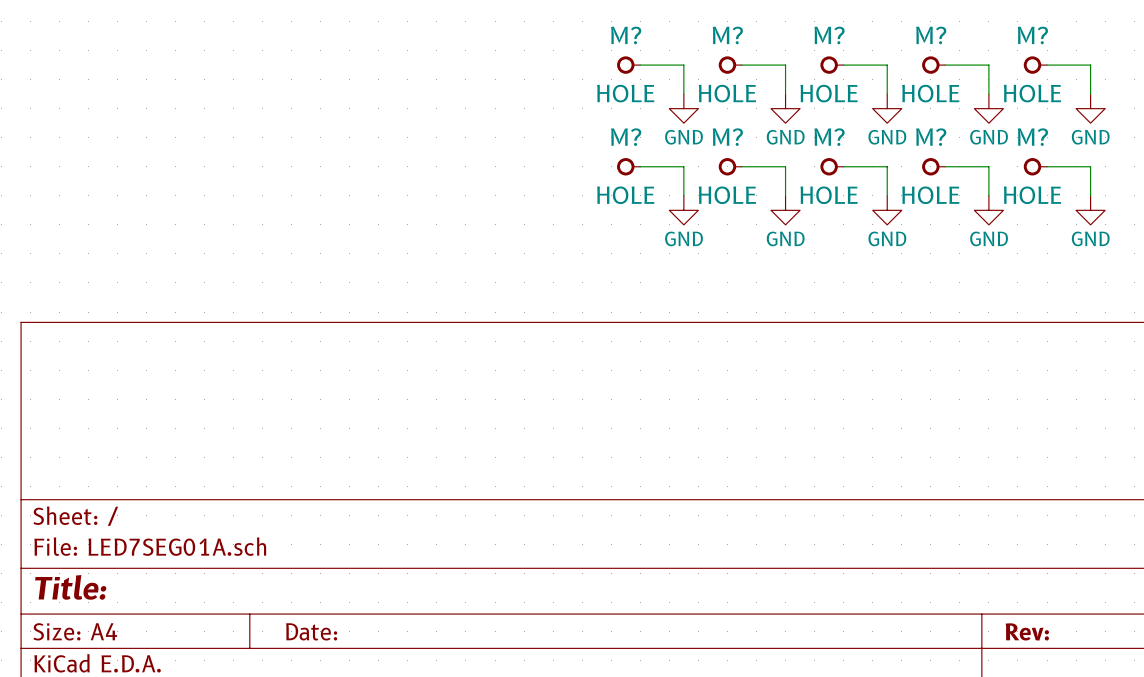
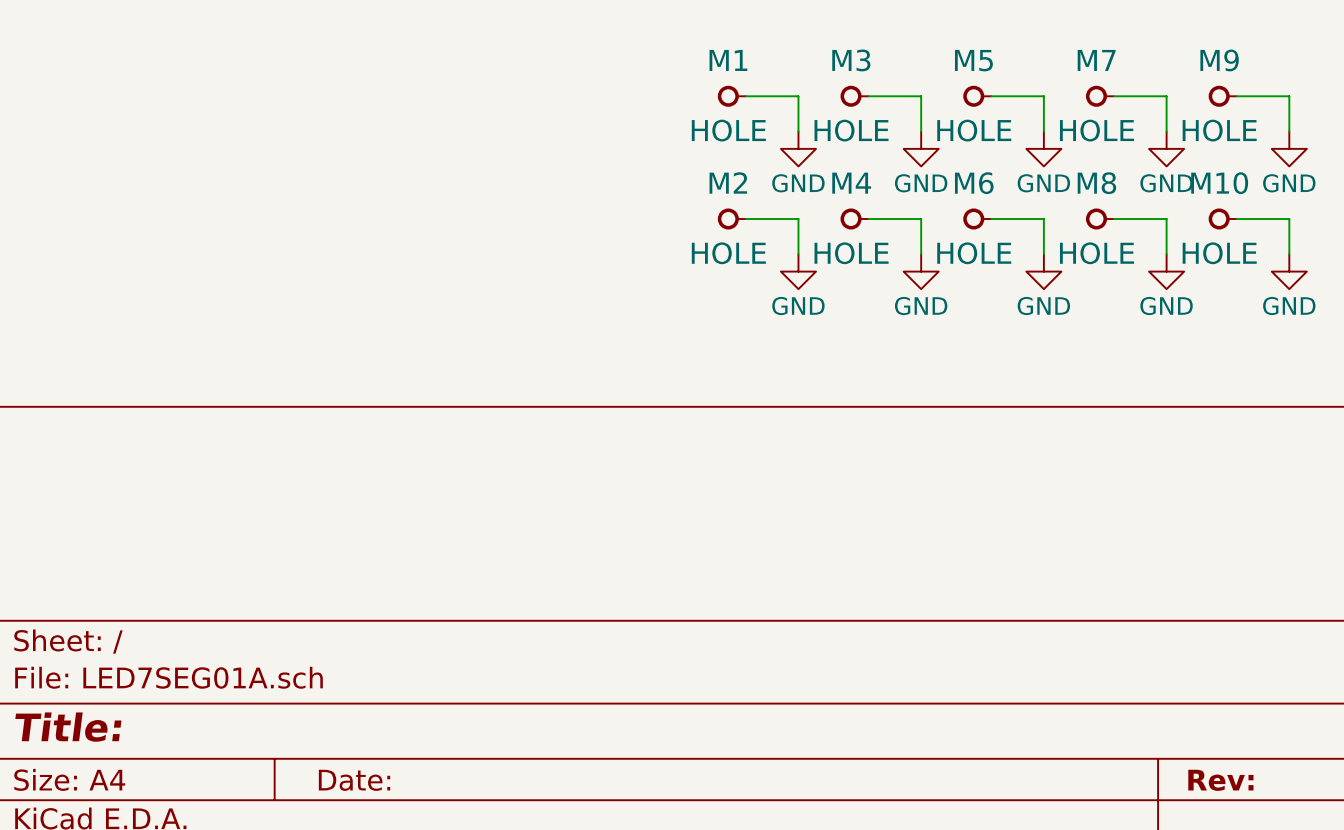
M? name: M? (626, 35) -> M1 (728, 60)
M? name: M? (727, 35) -> M3 (851, 60)
M? name: M? (829, 35) -> M5 (973, 60)
M? name: M? (931, 35) -> M7 (1096, 60)
M? name: M? (1032, 35) -> M9 (1219, 60)
M? name: M? (626, 137) -> M2 (728, 182)
M? name: M? (727, 137) -> M4 (851, 183)
M? name: M? (829, 137) -> M6 (974, 183)
M? name: M? (931, 137) -> M8 (1096, 183)
M? name: M? (1032, 137) -> M10 (1219, 183)

